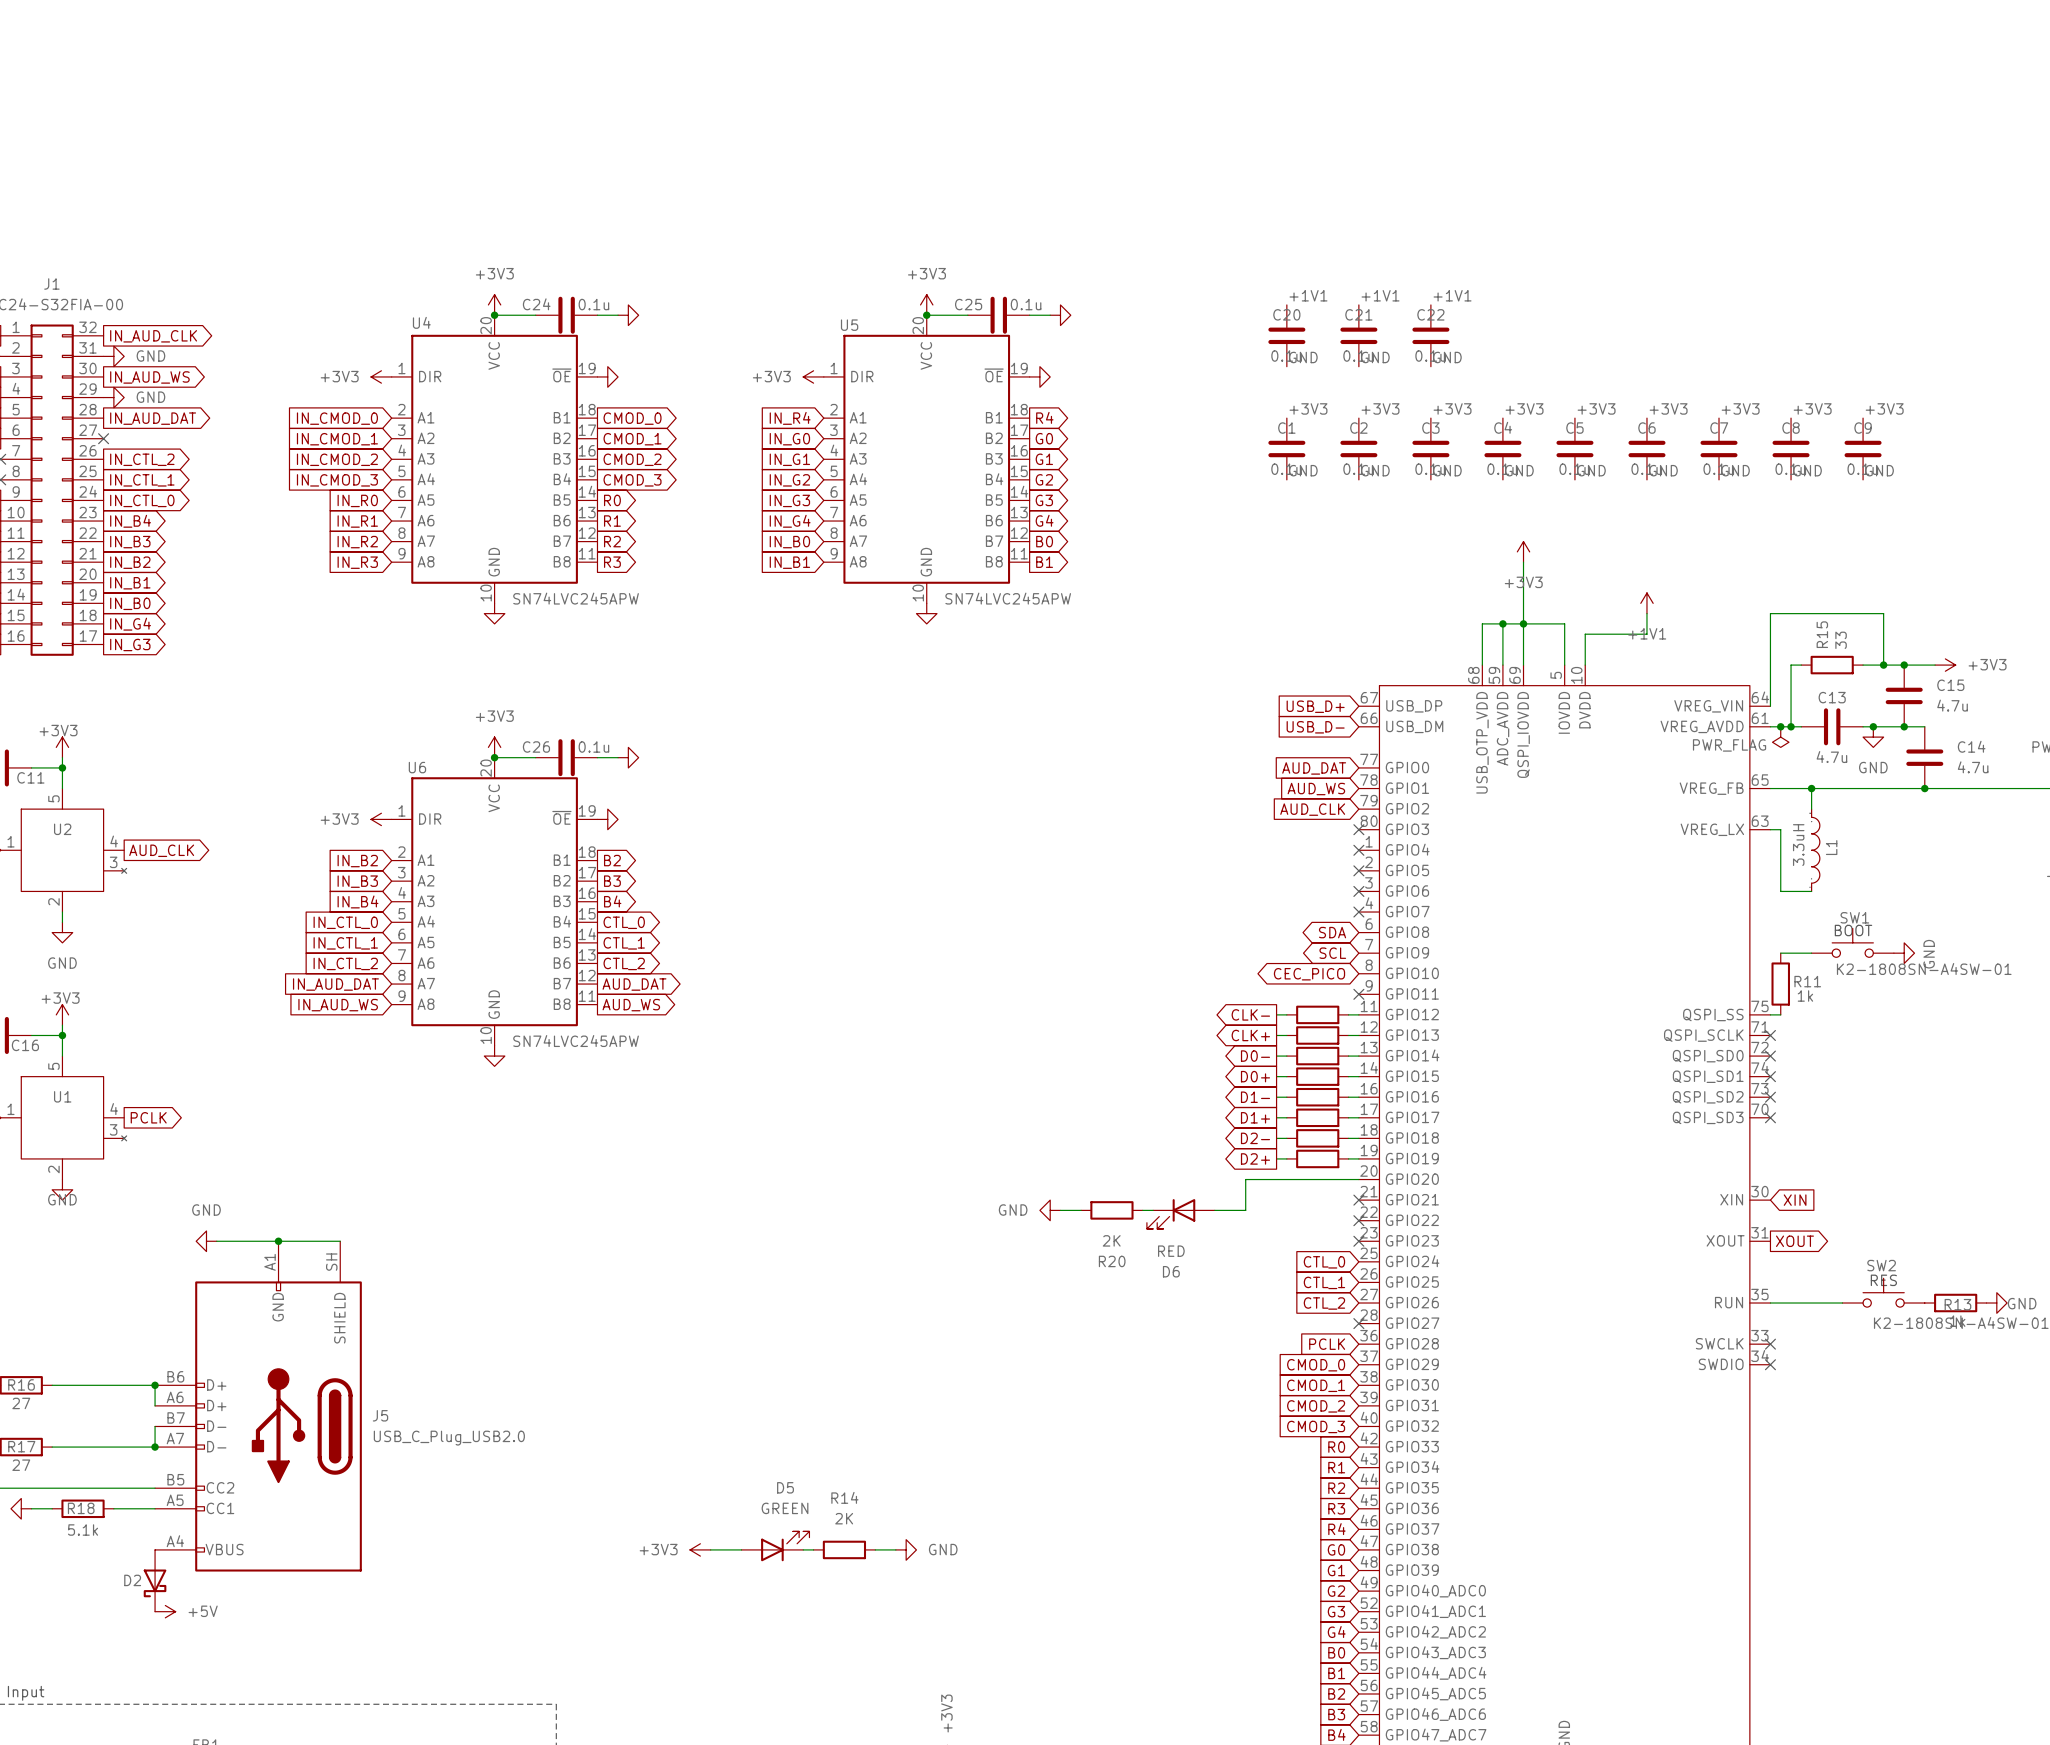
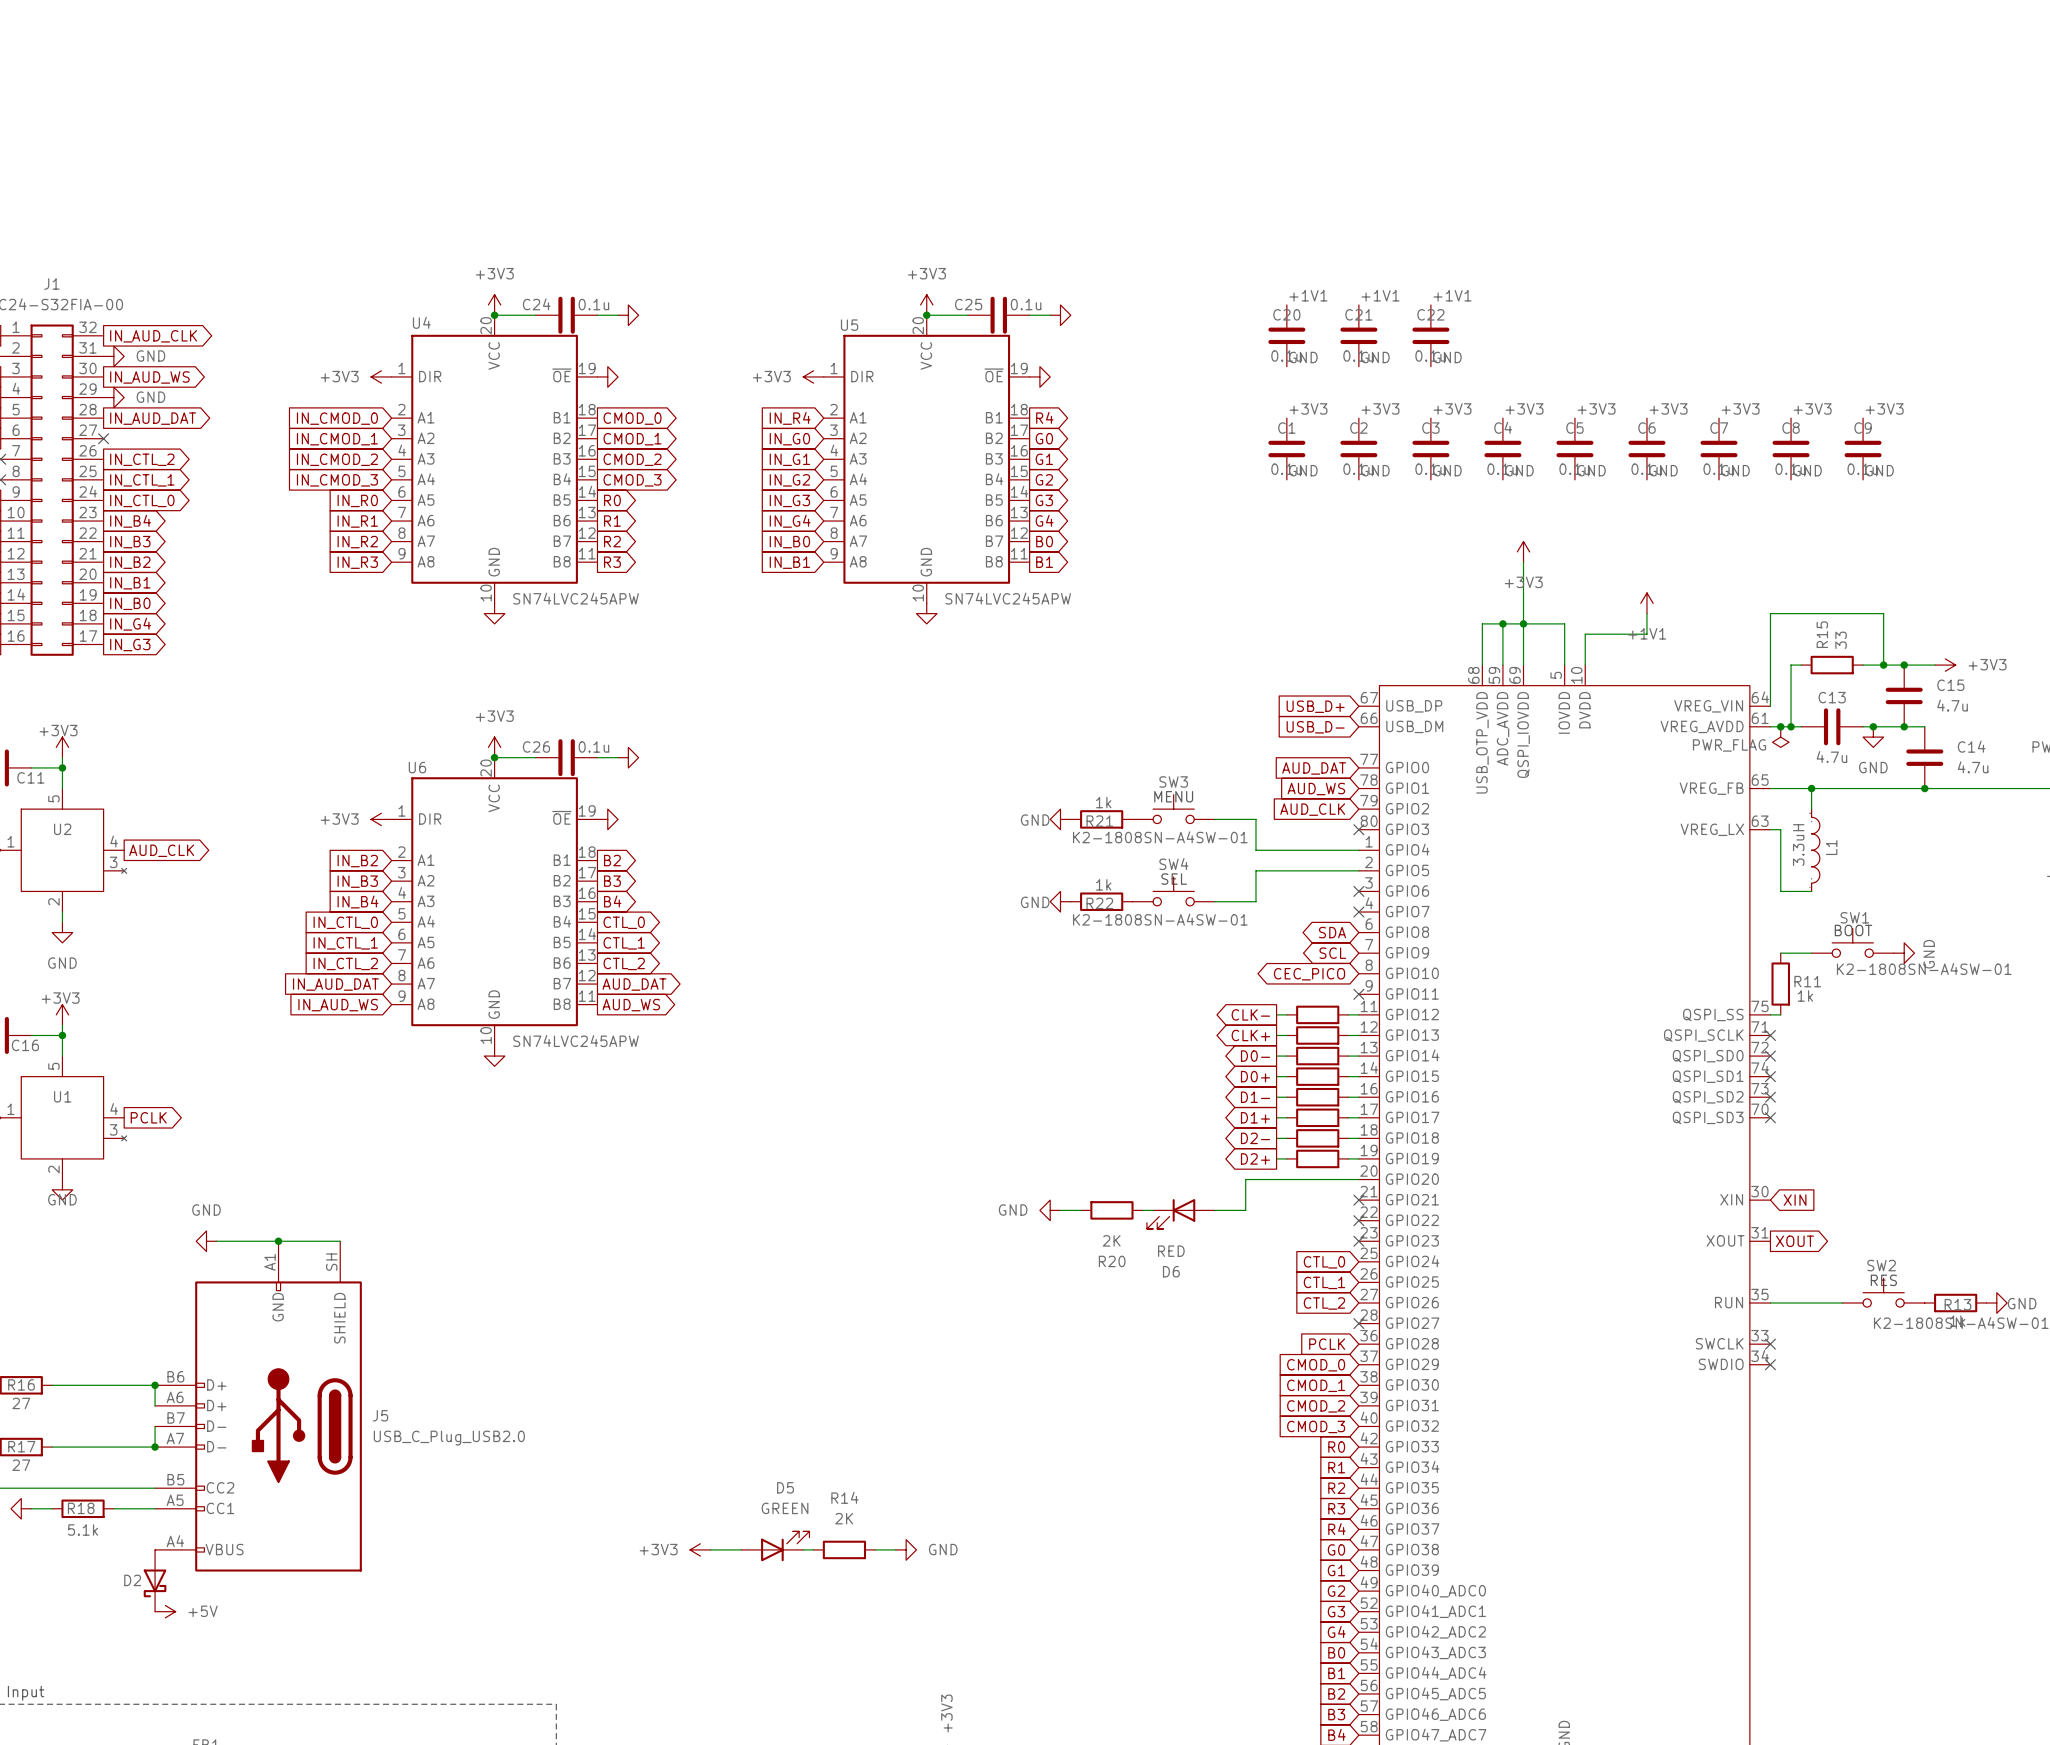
text: none -> MENU (1173, 796)
SW3: none -> K2-1808SN-A4SW-01 (1173, 809)
power symbol: none -> GND (1060, 819)
R21: none -> 1k (1101, 819)
wire: none -> (1214, 819) (1255, 819) (1255, 850) (1358, 850)
no-connect mark: (1358, 850) -> none
wire: none -> (1358, 870) (1255, 870) (1255, 901) (1214, 901)
no-connect mark: (1358, 870) -> none
text: none -> SEL (1174, 879)
SW4: none -> K2-1808SN-A4SW-01 (1173, 891)
power symbol: none -> GND (1060, 901)
R22: none -> 1k (1101, 901)

